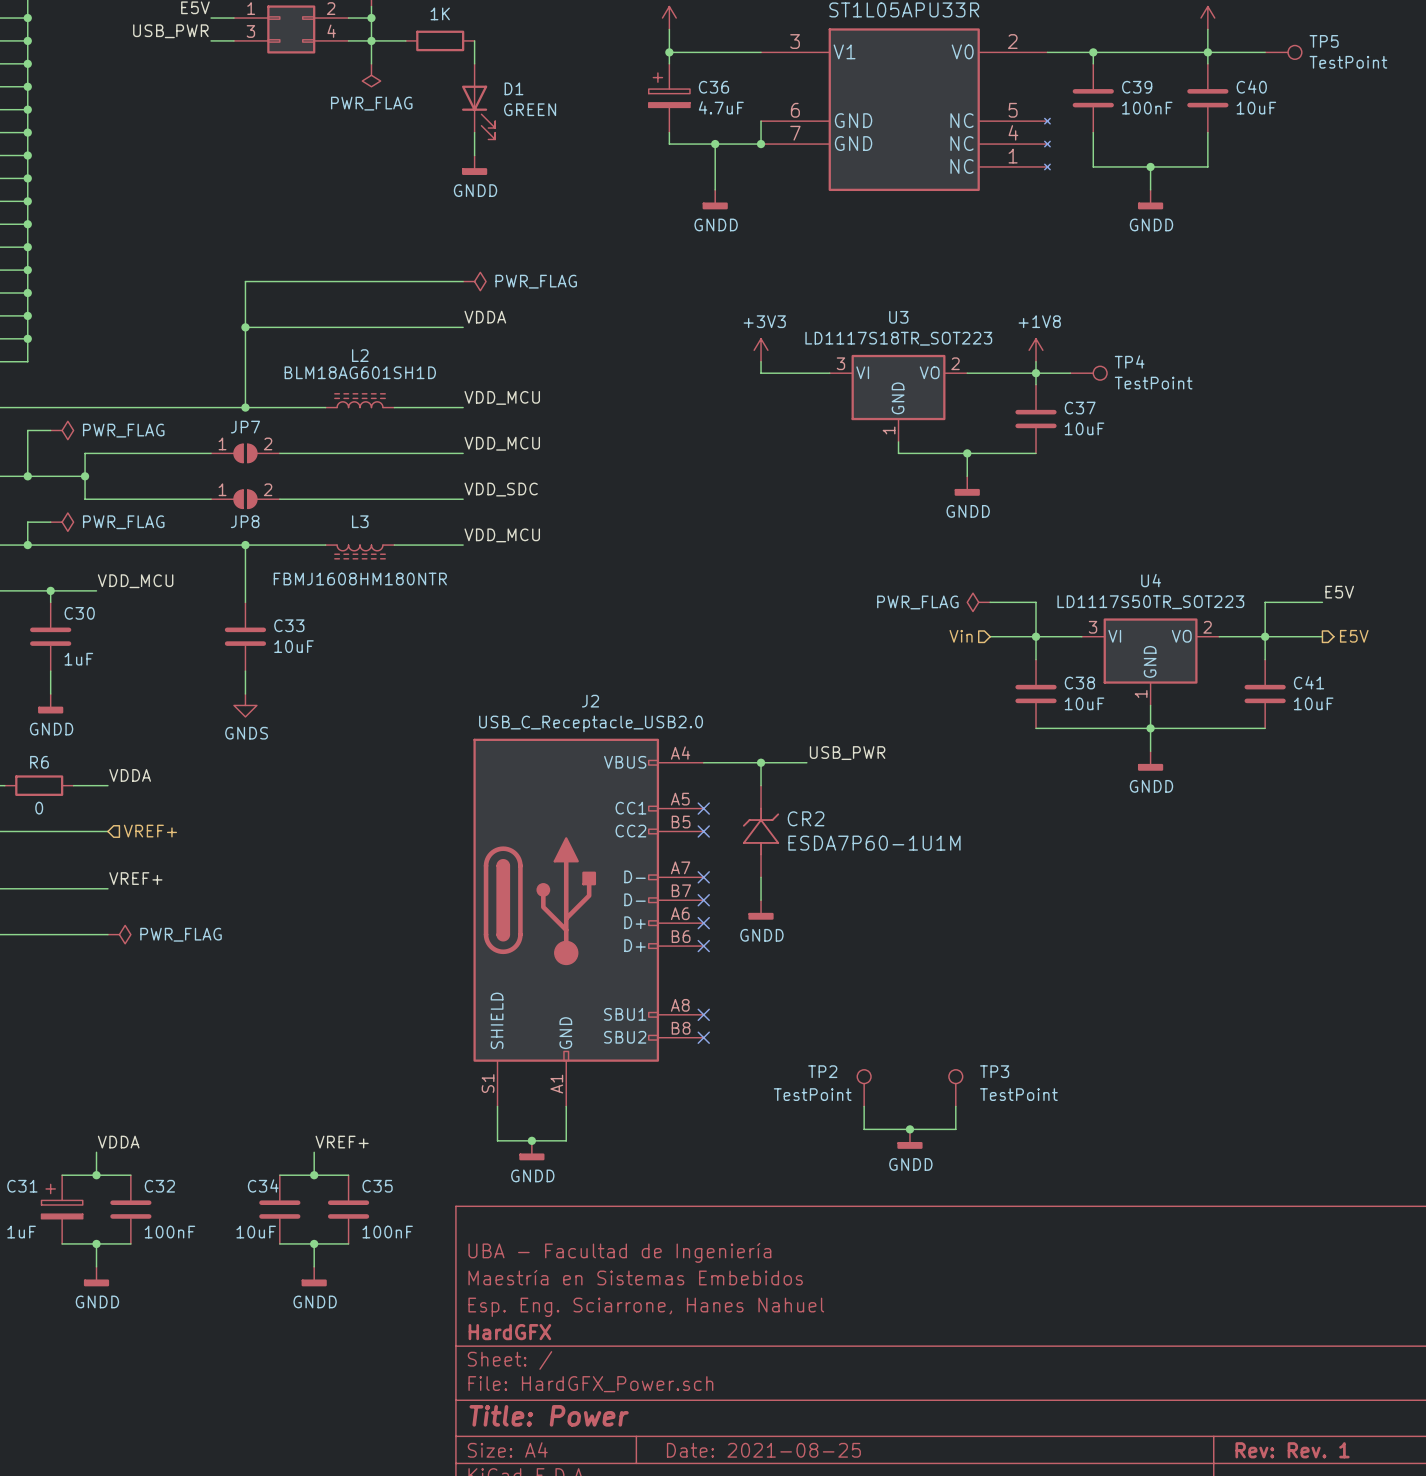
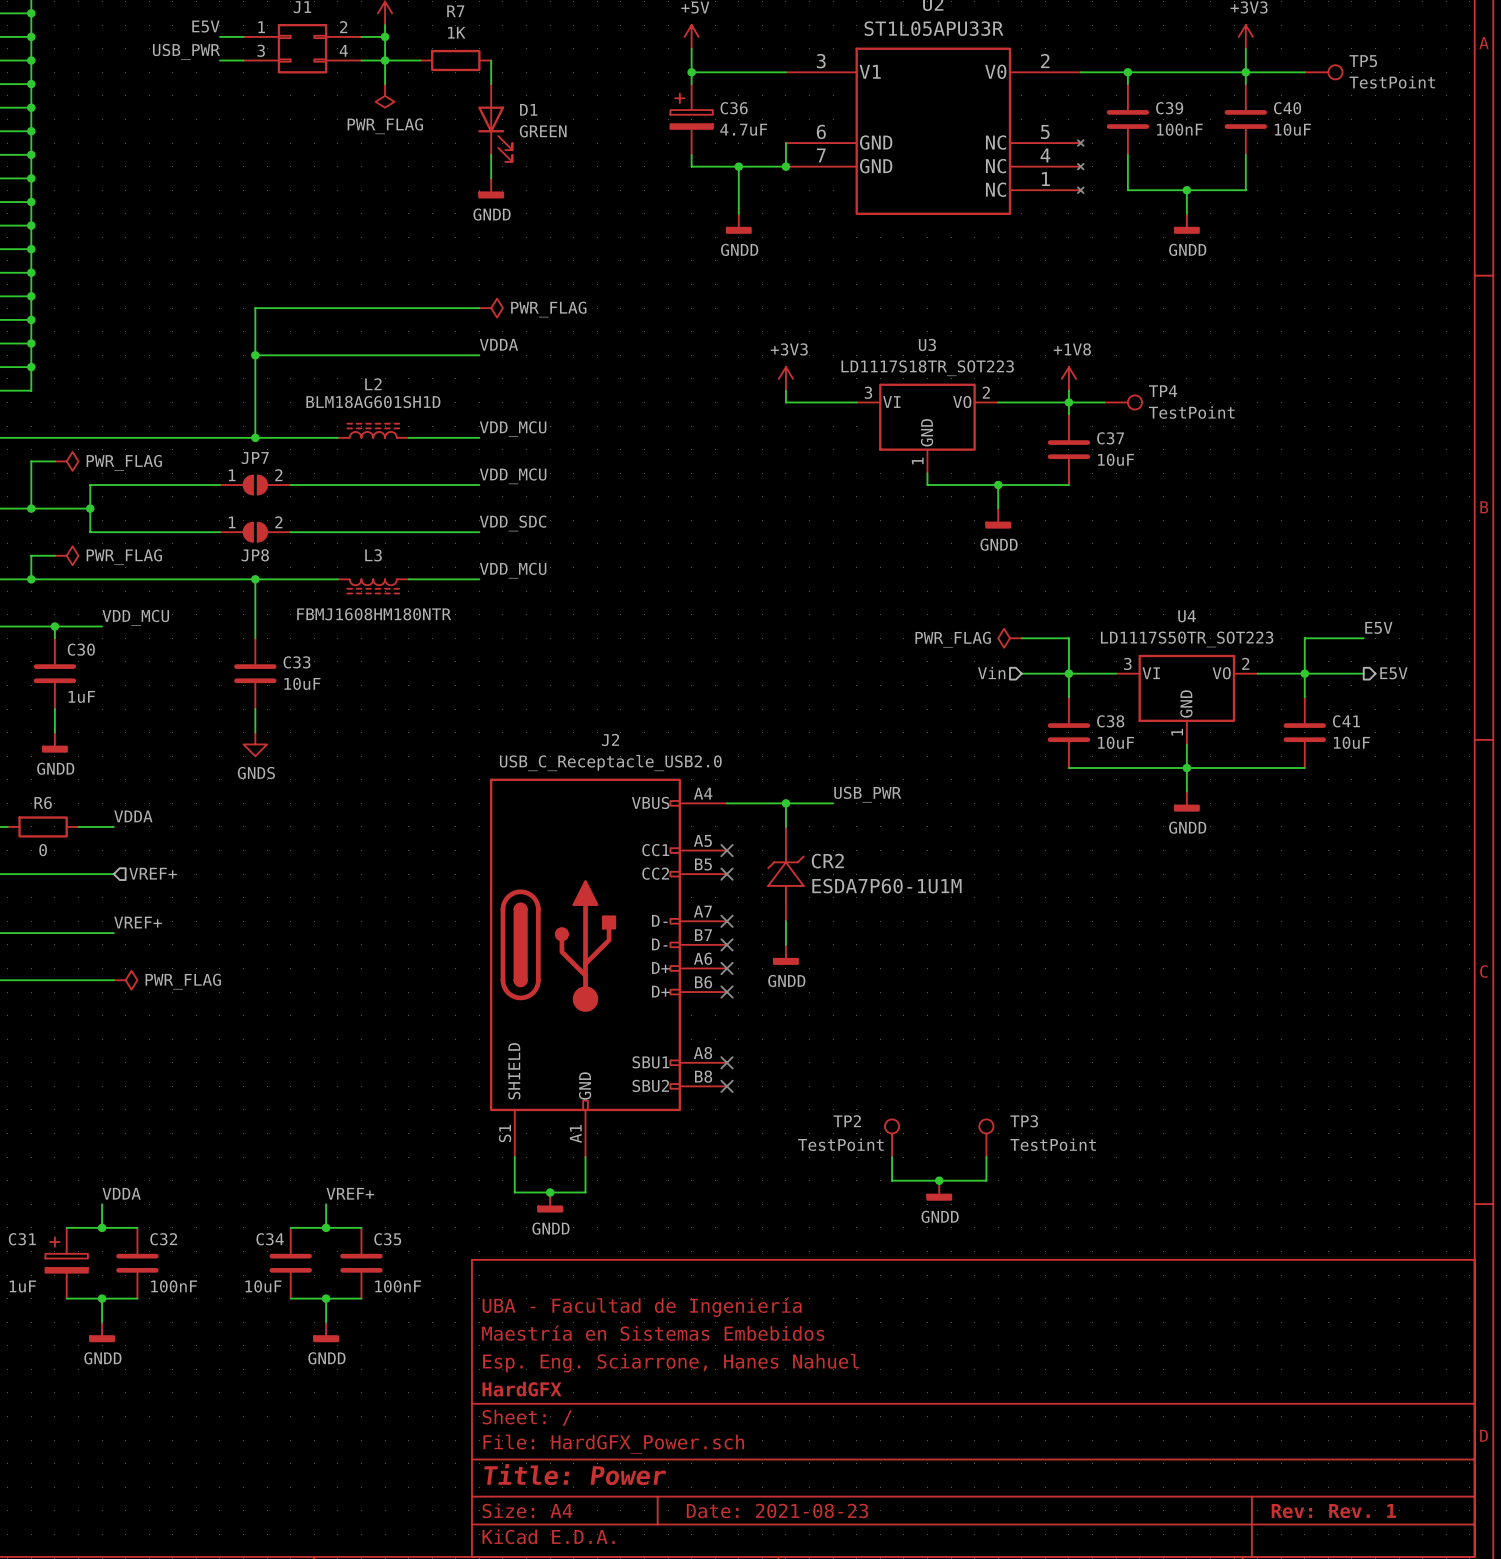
title block: Date: 2021-08-25 (763, 1450) -> Date: 2021-08-23 (777, 1510)

